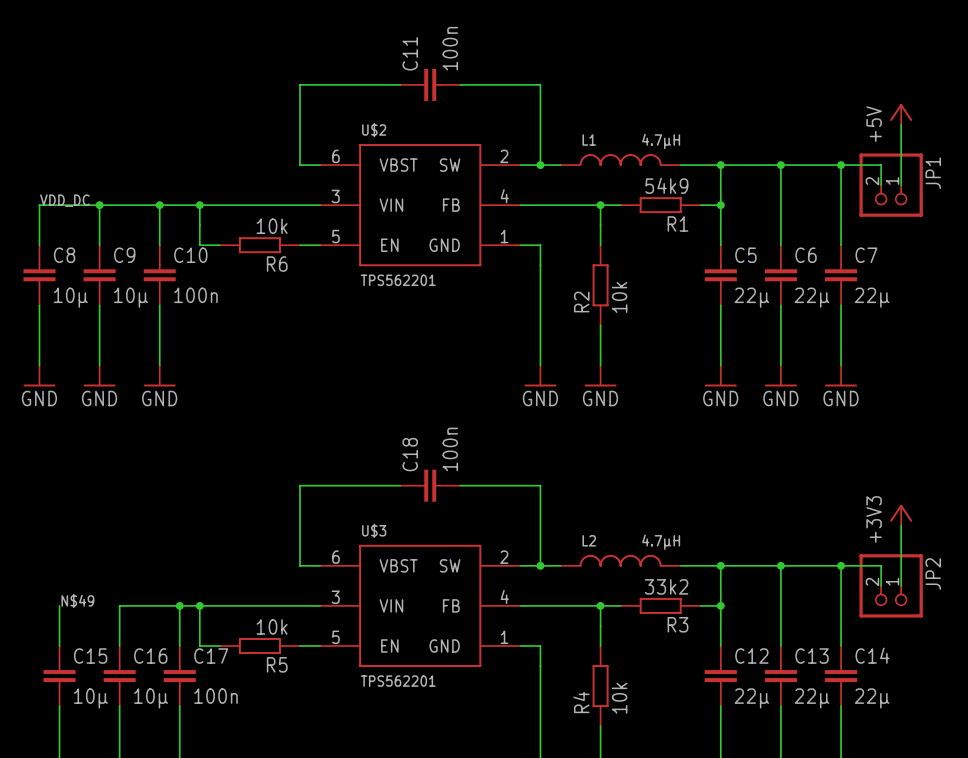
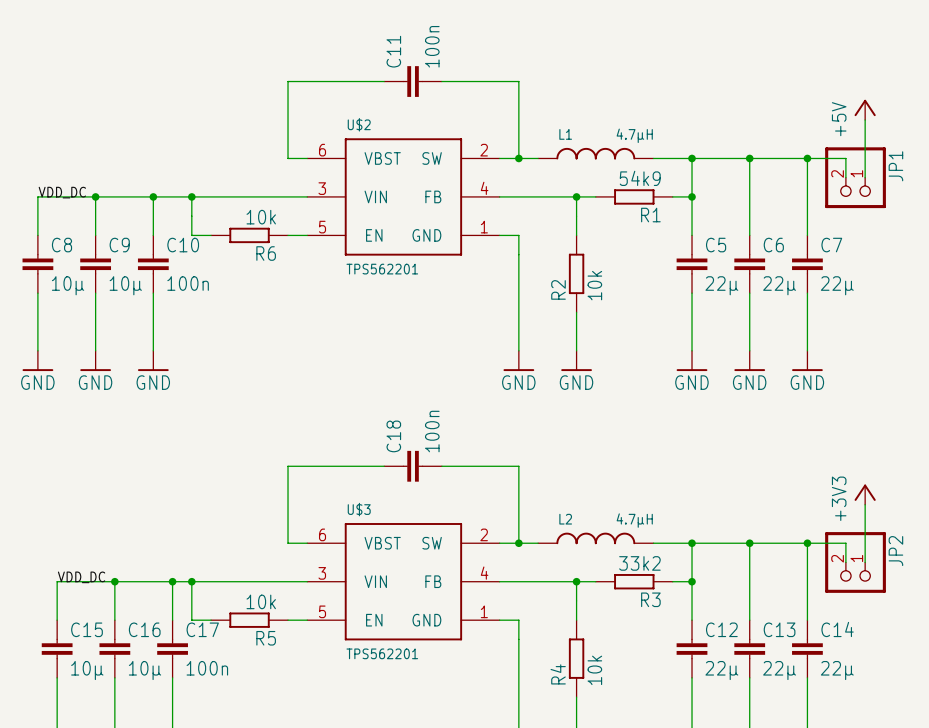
label: N$49 (77, 600) -> VDD_DC (81, 577)
wire: none -> (57, 581) (114, 581)
junction: none -> (114, 581)

